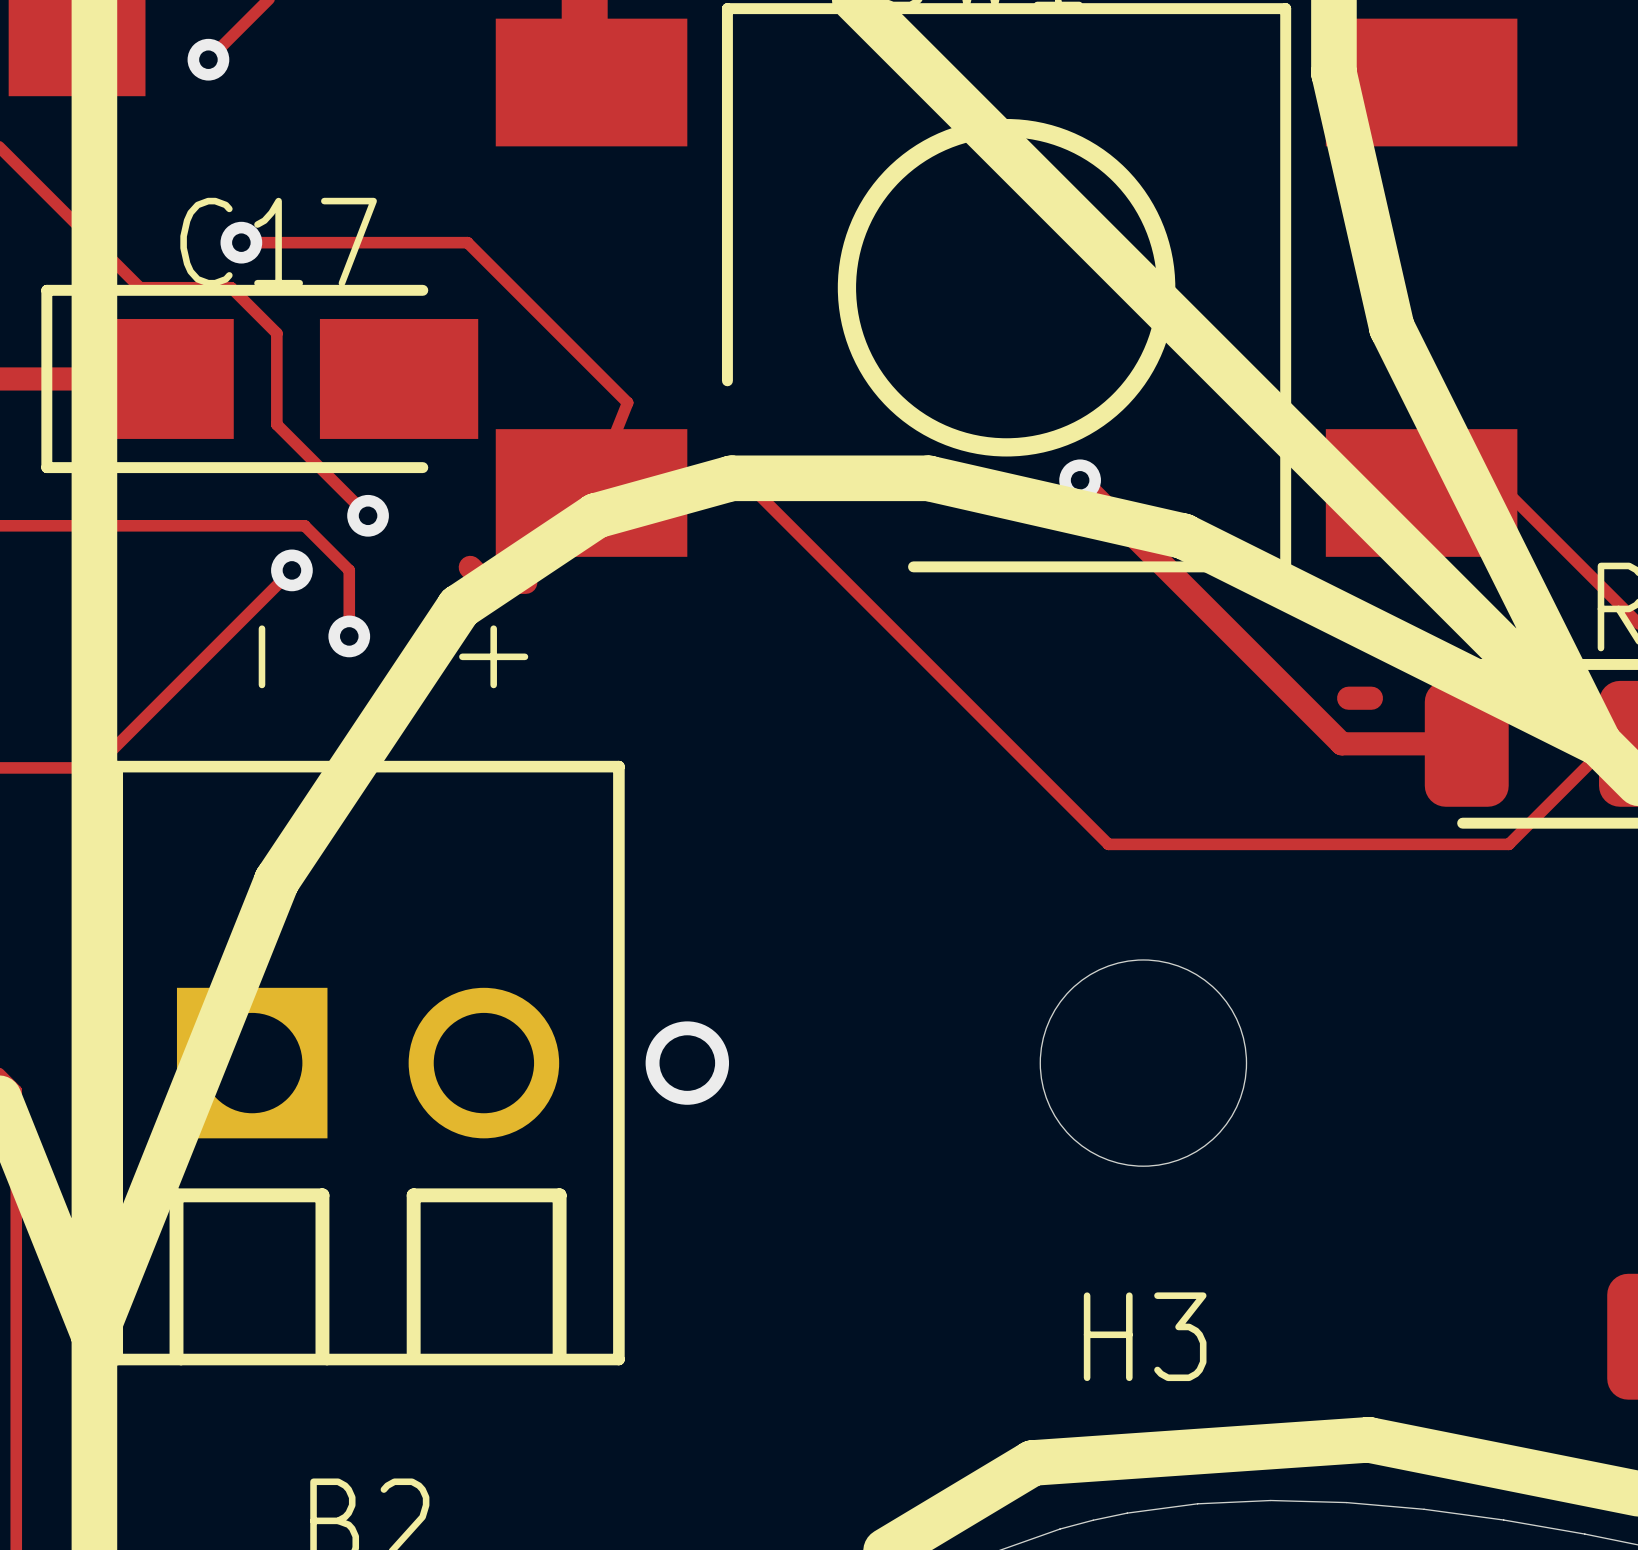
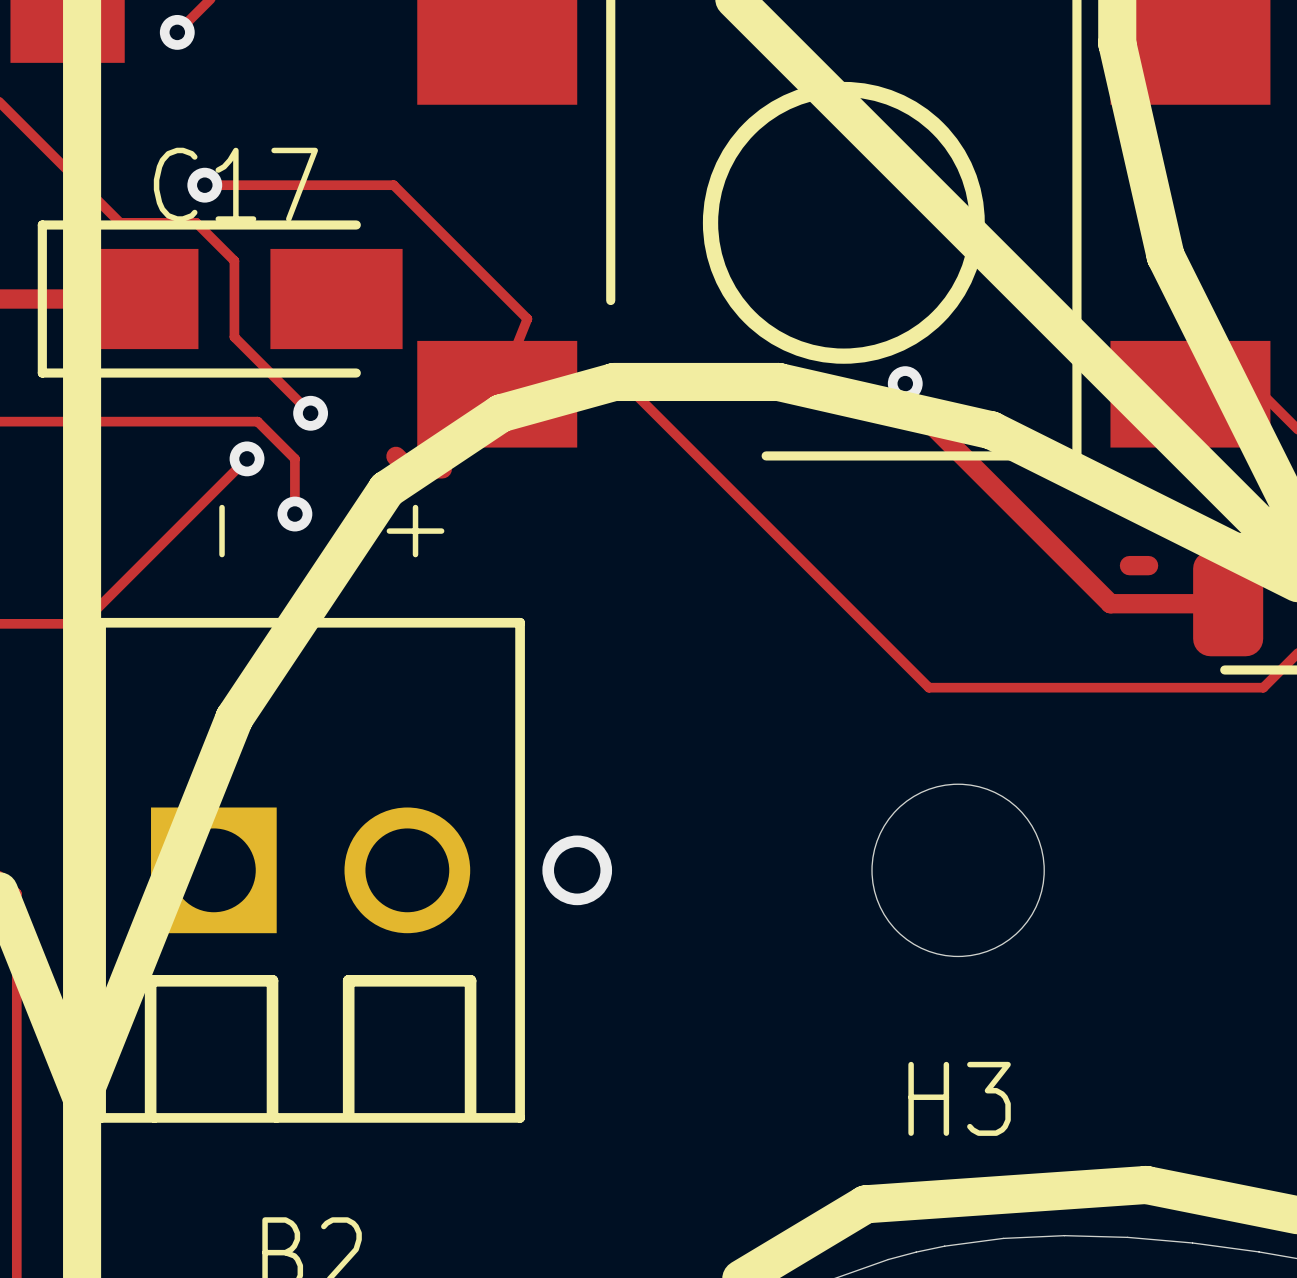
track: (1080, 480) (1341, 743) -> (905, 398) (1110, 603) (1123, 603)

